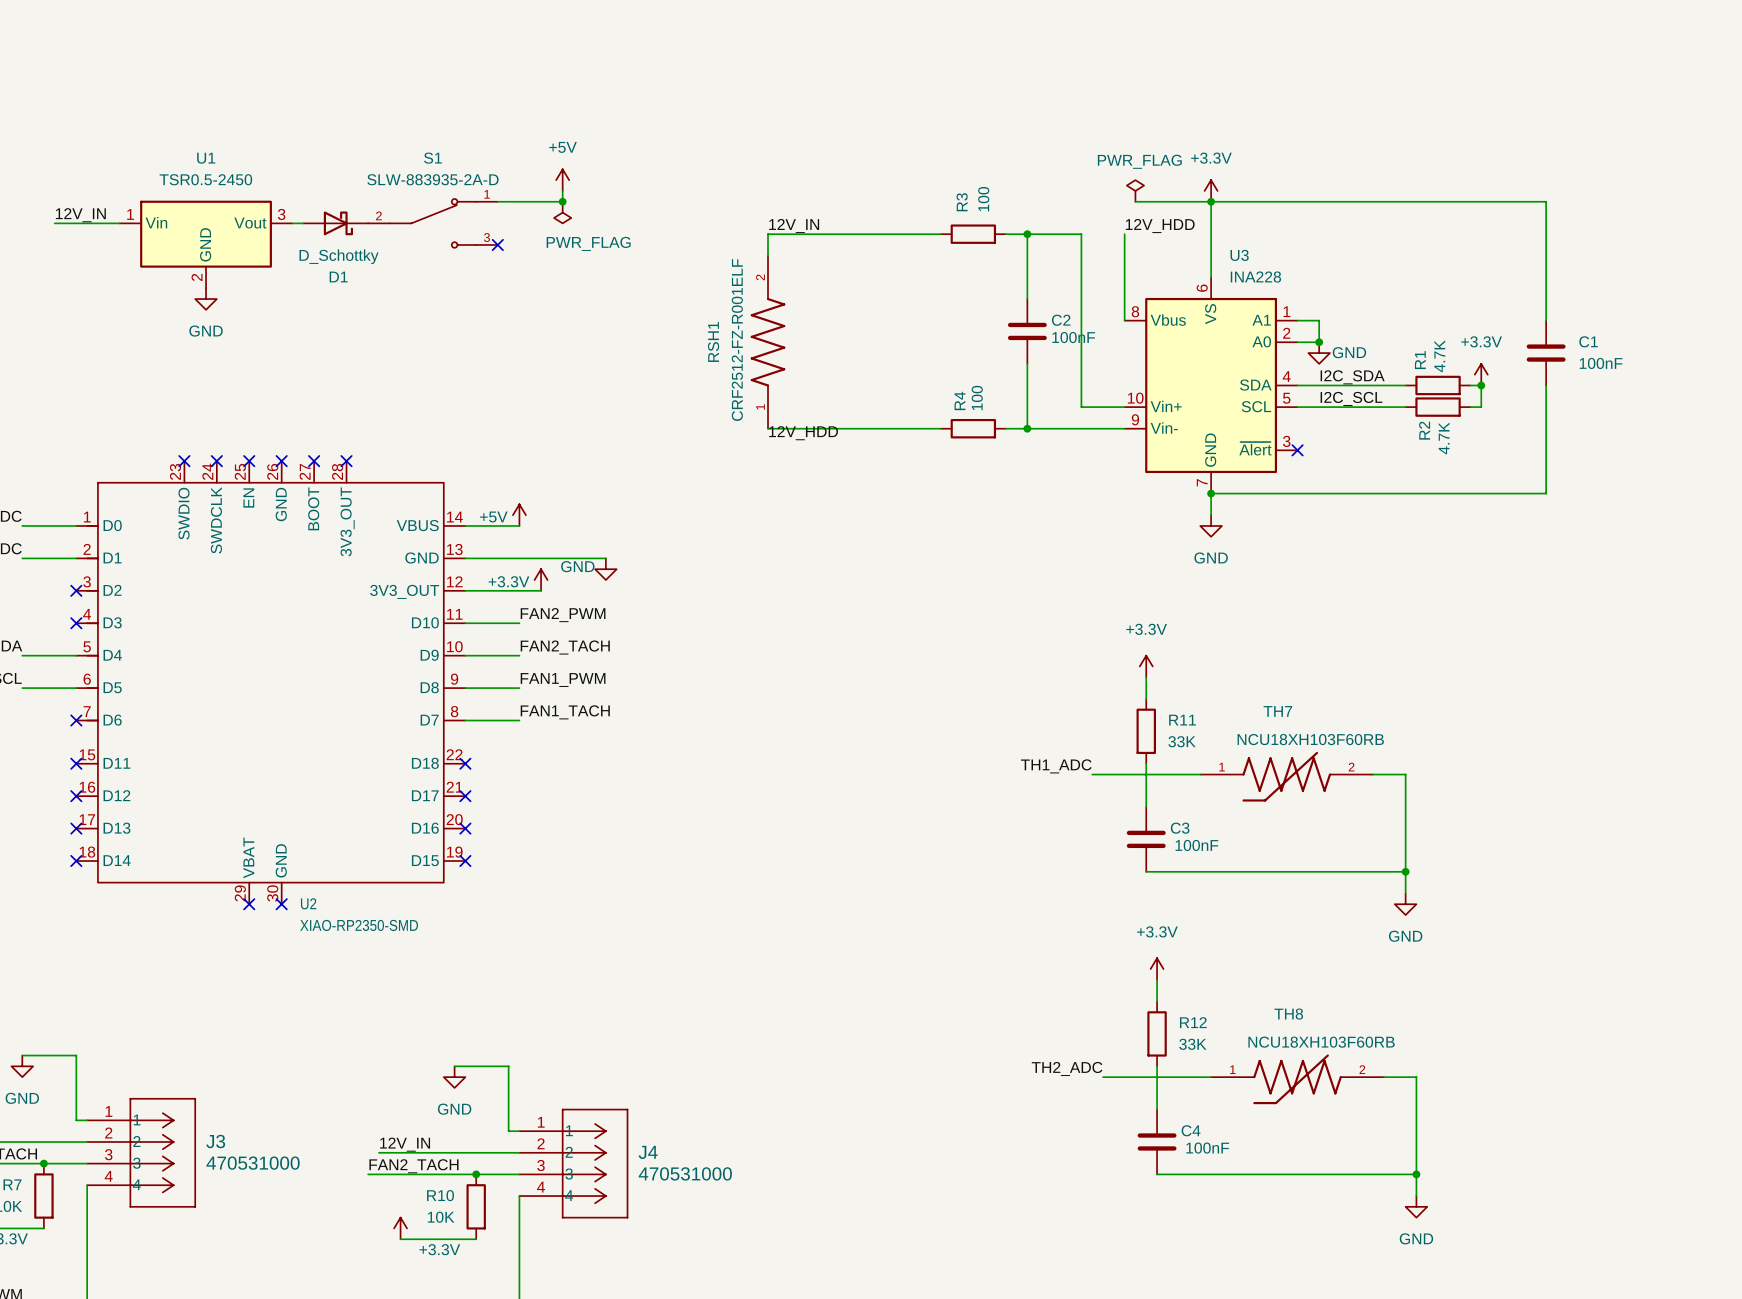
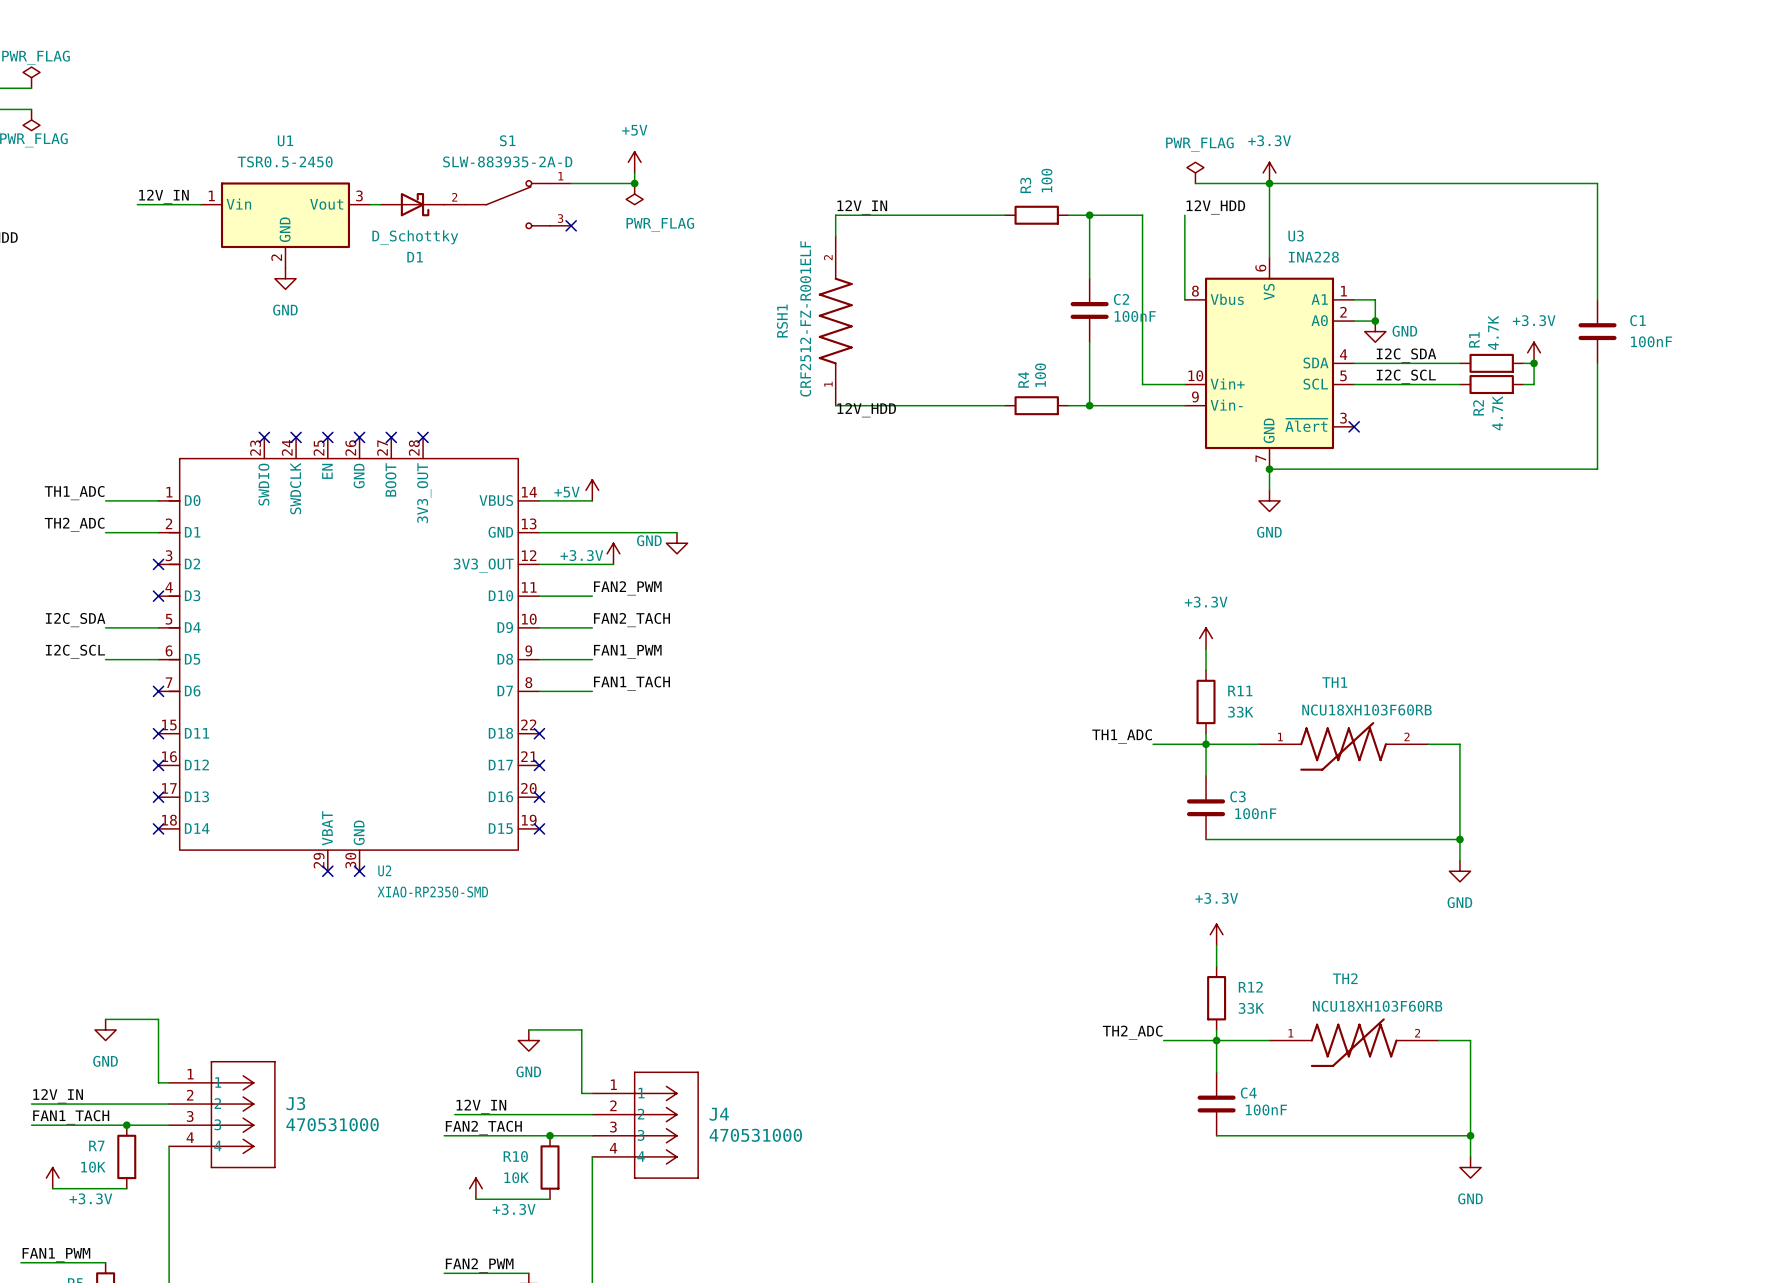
TH7 name: TH7 (1277, 711) -> TH1 (1334, 682)
junction: none -> (1206, 744)
TH8 name: TH8 (1288, 1014) -> TH2 (1345, 978)
junction: none -> (1216, 1040)

